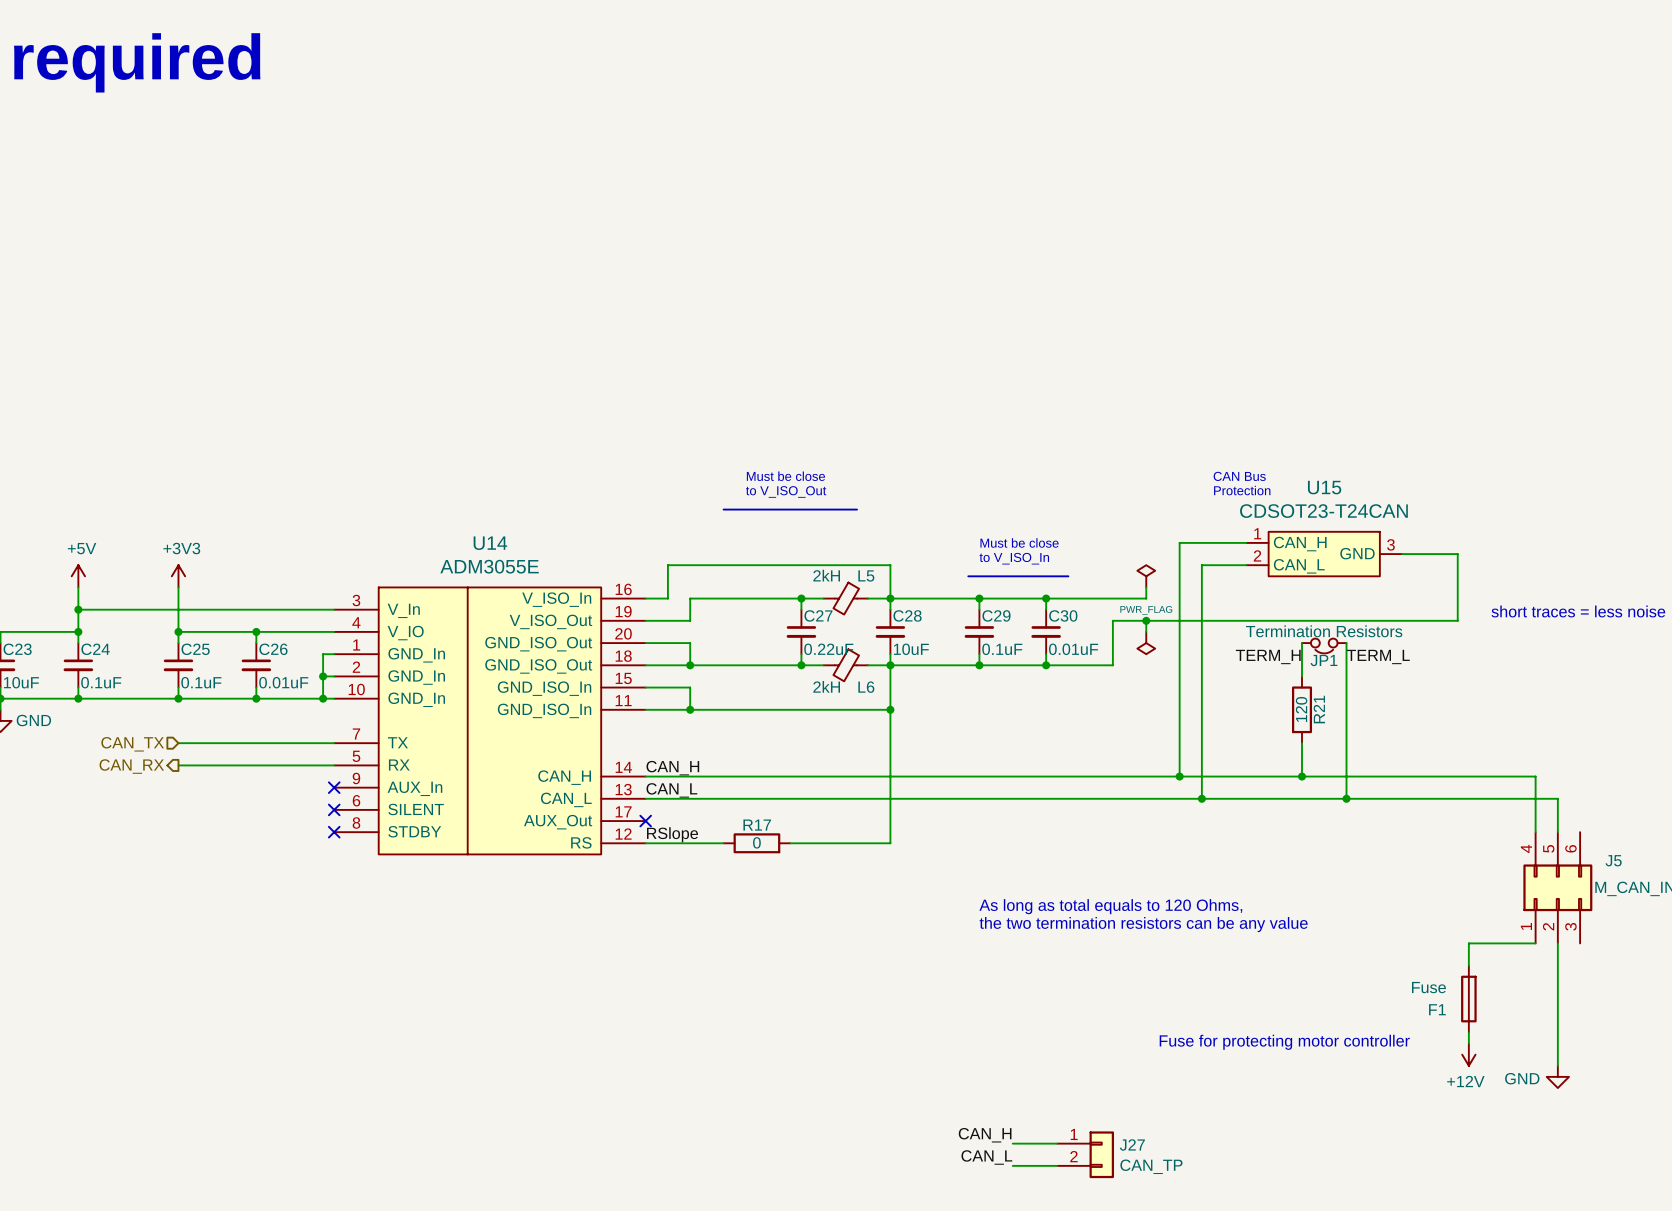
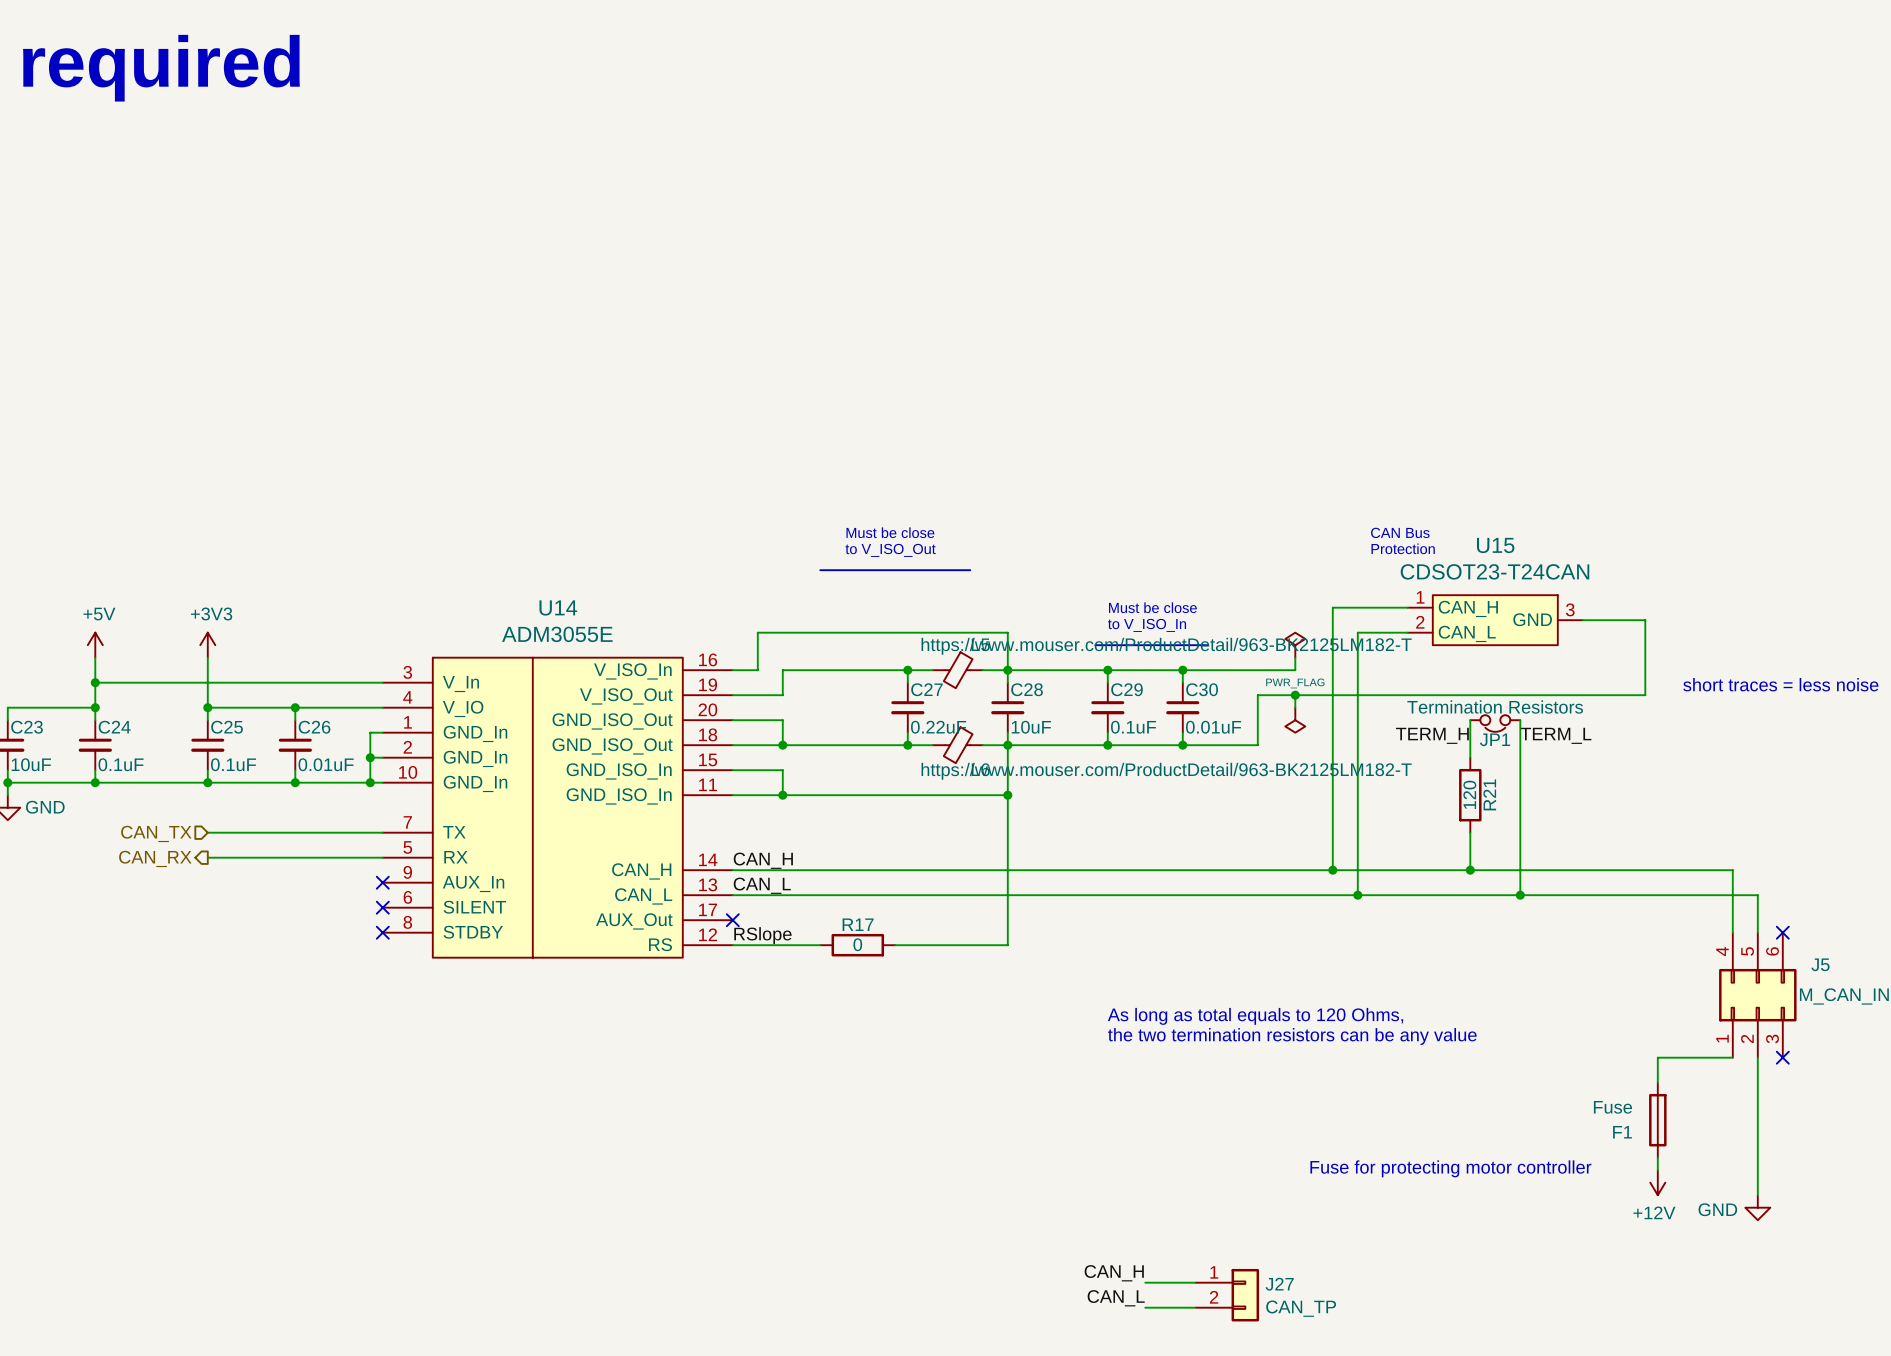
L5 value: 2kH (826, 575) -> https://www.mouser.com/ProductDetail/963-BK2125LM182-T (1166, 646)
L6 value: 2kH (826, 686) -> https://www.mouser.com/ProductDetail/963-BK2125LM182-T (1166, 771)
no-connect mark: none -> (1782, 932)
no-connect mark: none -> (1782, 1057)

